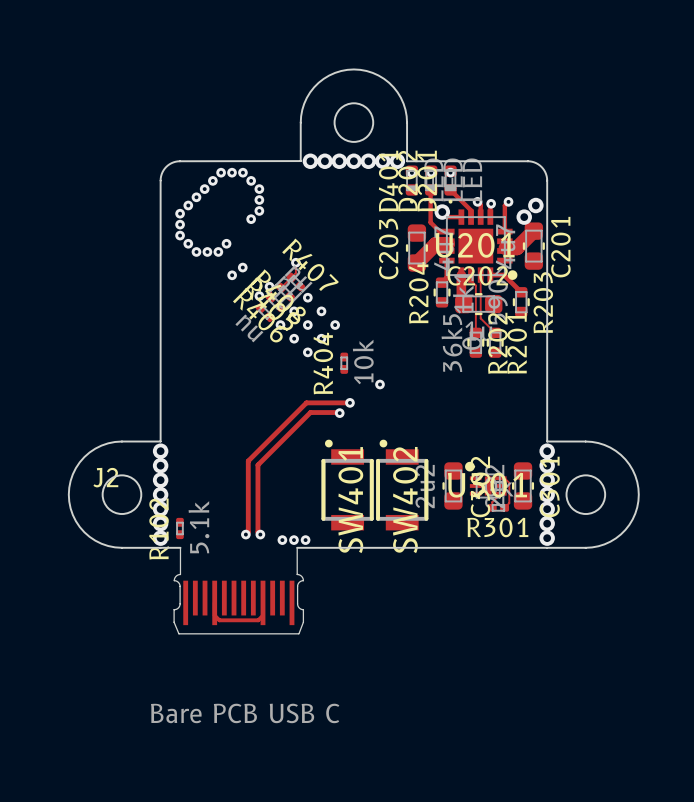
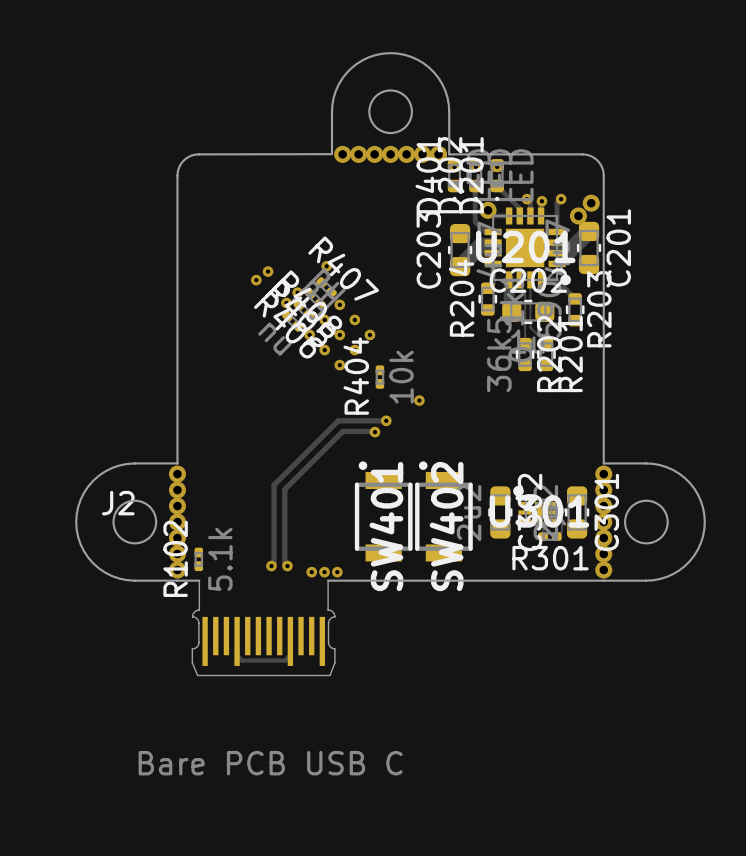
via: (221, 172) -> none
via: (232, 172) -> none
via: (242, 172) -> none
via: (212, 180) -> none
via: (251, 180) -> none
via: (204, 189) -> none
via: (259, 189) -> none
via: (196, 197) -> none
via: (259, 200) -> none
via: (188, 205) -> none
via: (259, 210) -> none
via: (180, 213) -> none
via: (251, 219) -> none
via: (180, 224) -> none
via: (180, 235) -> none
via: (188, 243) -> none
via: (226, 243) -> none
via: (196, 251) -> none
via: (207, 251) -> none
via: (218, 251) -> none

